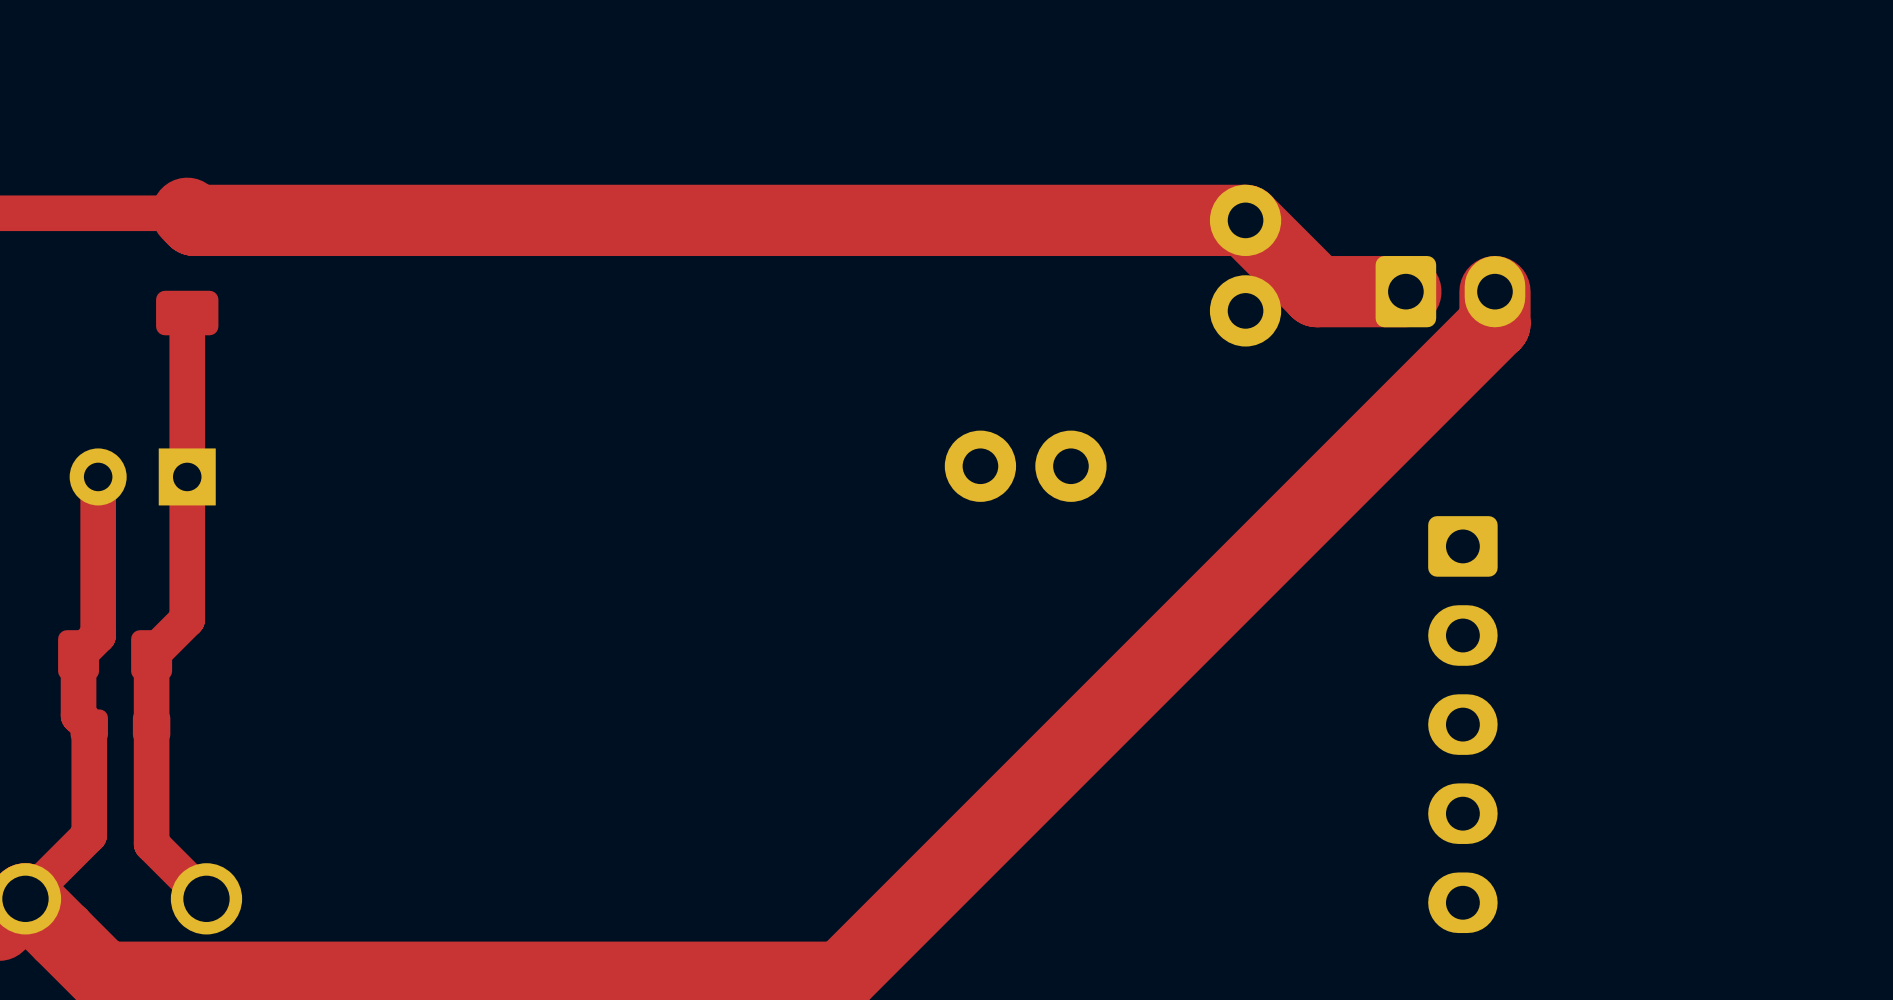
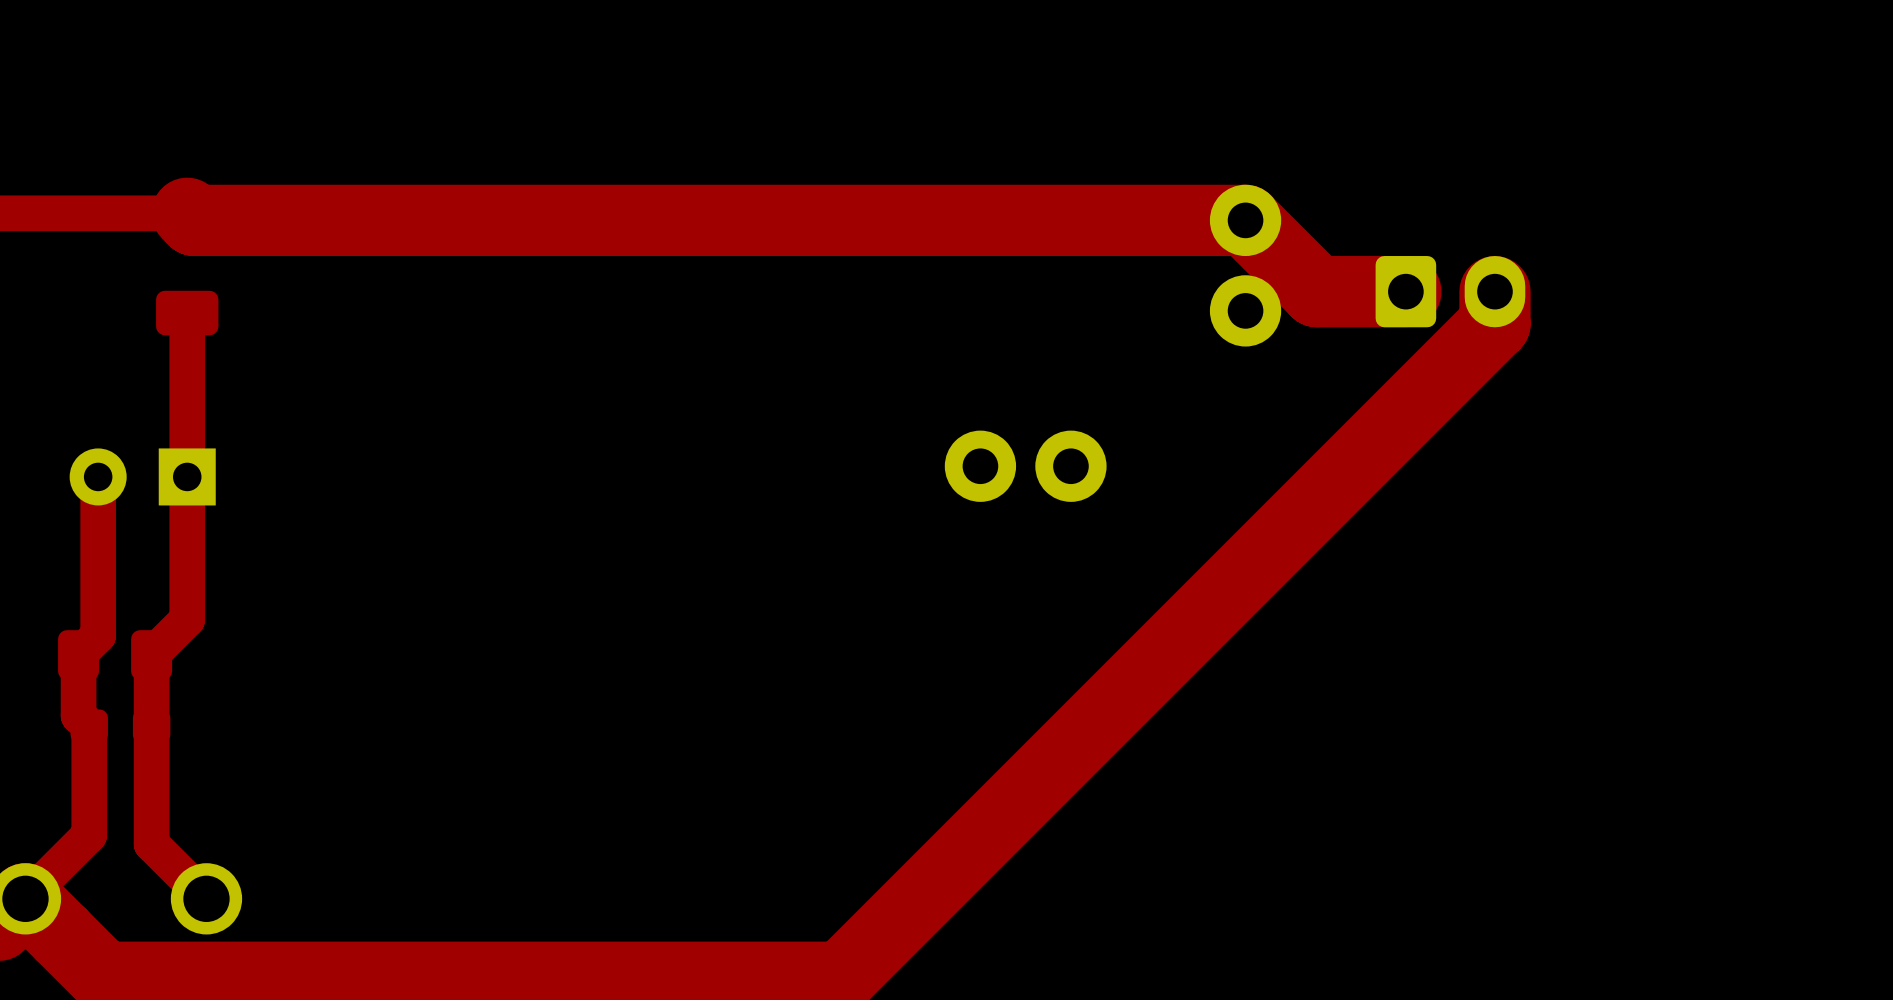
part: (1462, 724) -> none

